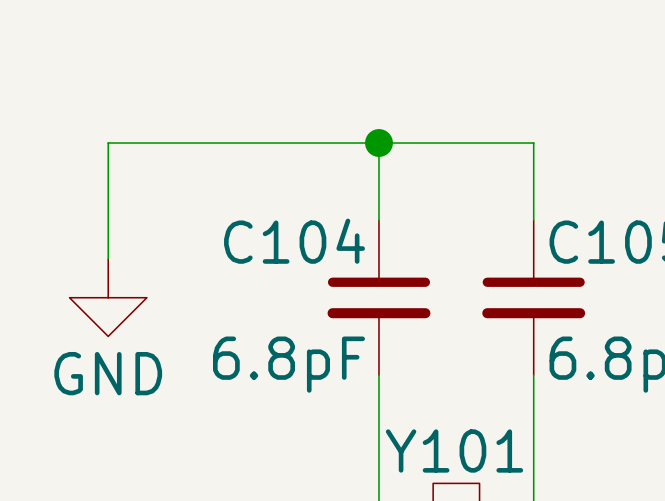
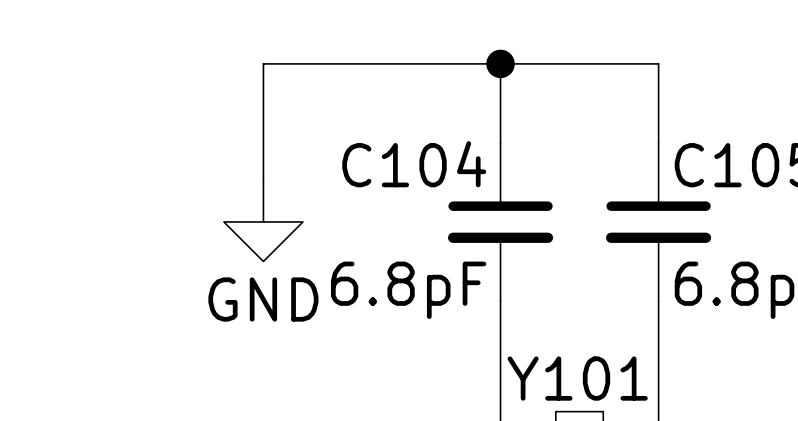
wire: (146, 143) (108, 143) (108, 259) -> (263, 63) (263, 182)
power symbol position: GND (108, 297) -> GND (263, 221)

